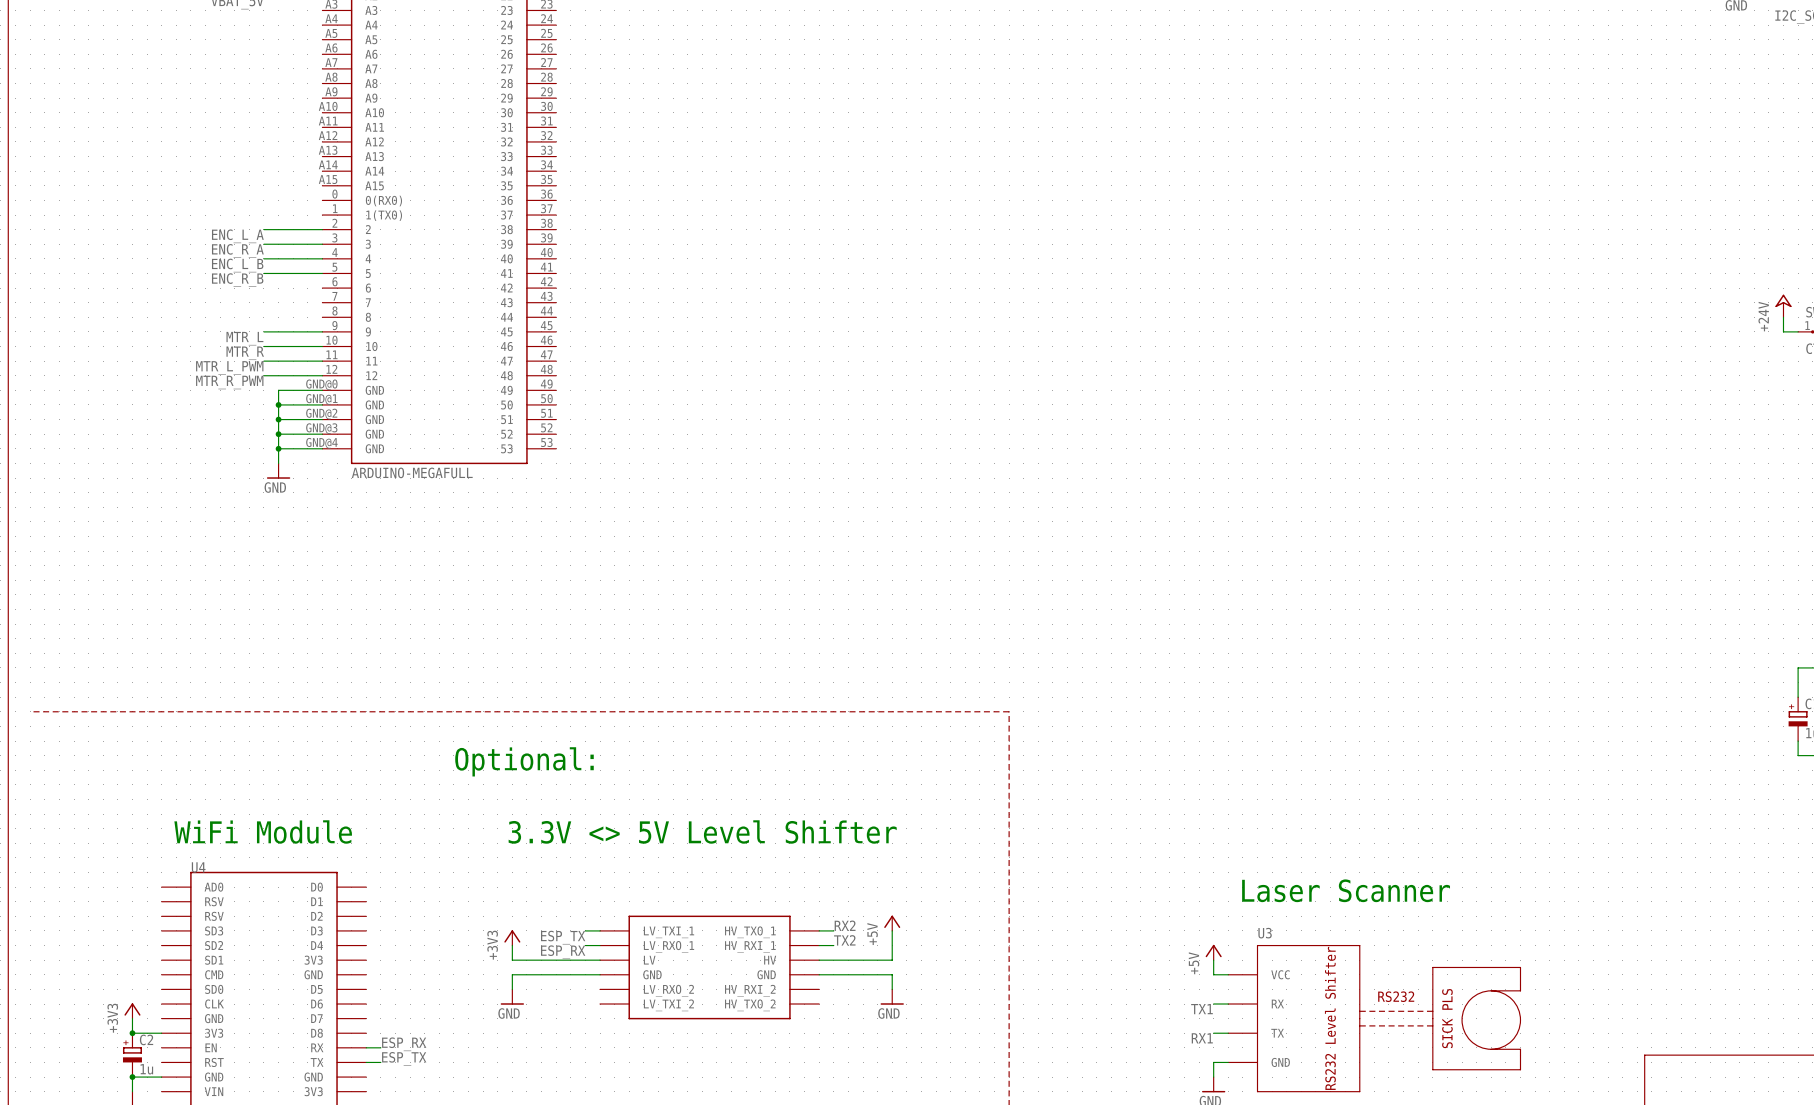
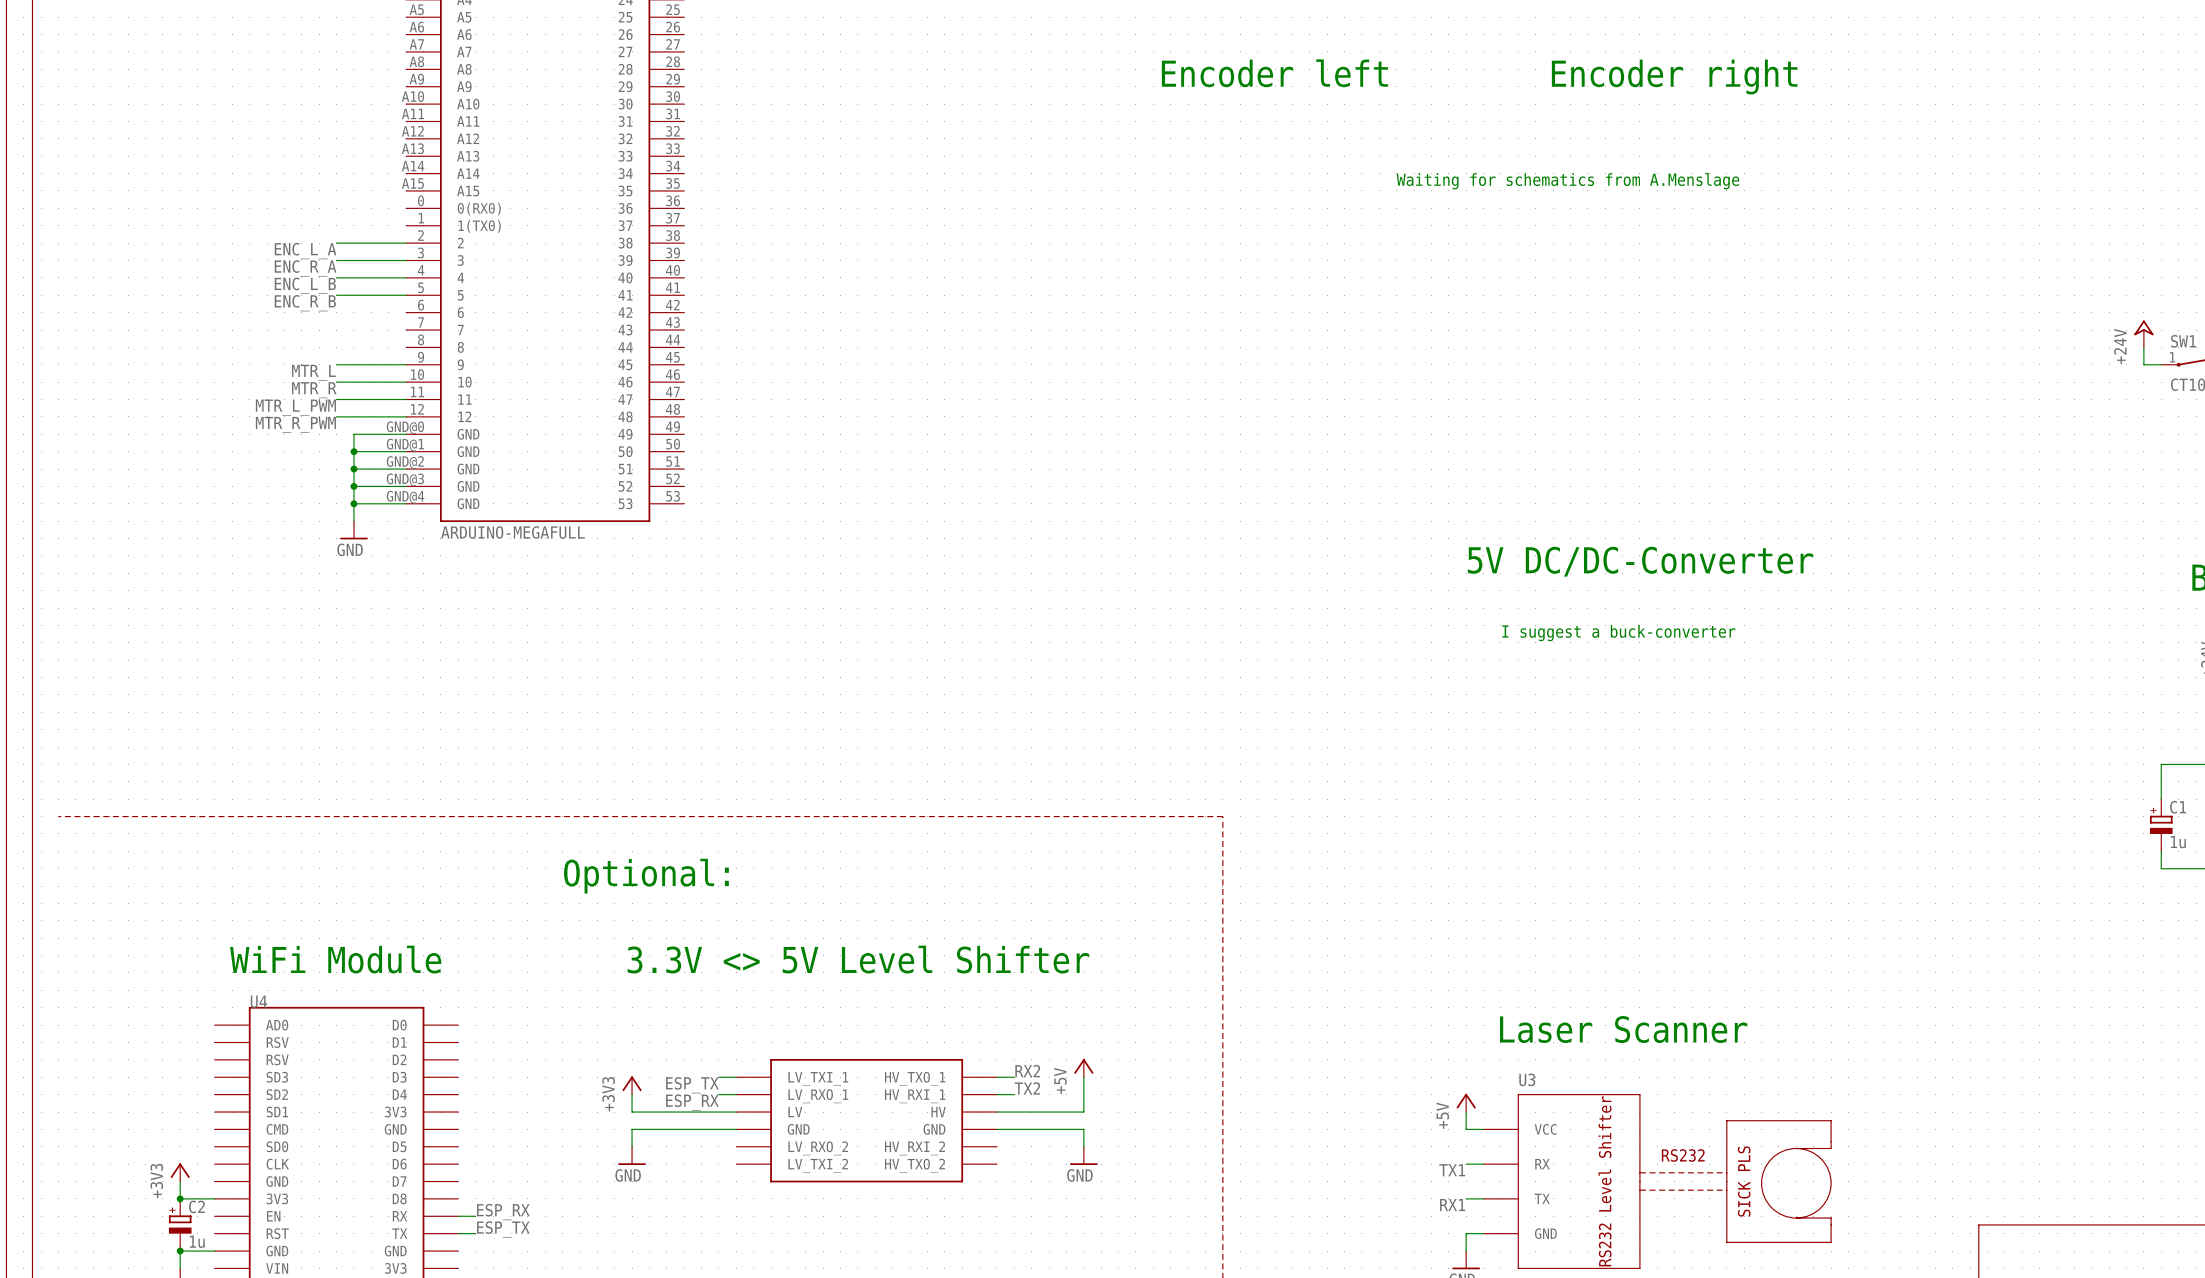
text: none -> Encoder left (1274, 73)
text: none -> Encoder right (1674, 76)
text: none -> Waiting for schematics from A.Menslage (1567, 181)
text: none -> 5V DC/DC-Converter (1640, 561)
text: none -> I suggest a buck-converter (1618, 633)

